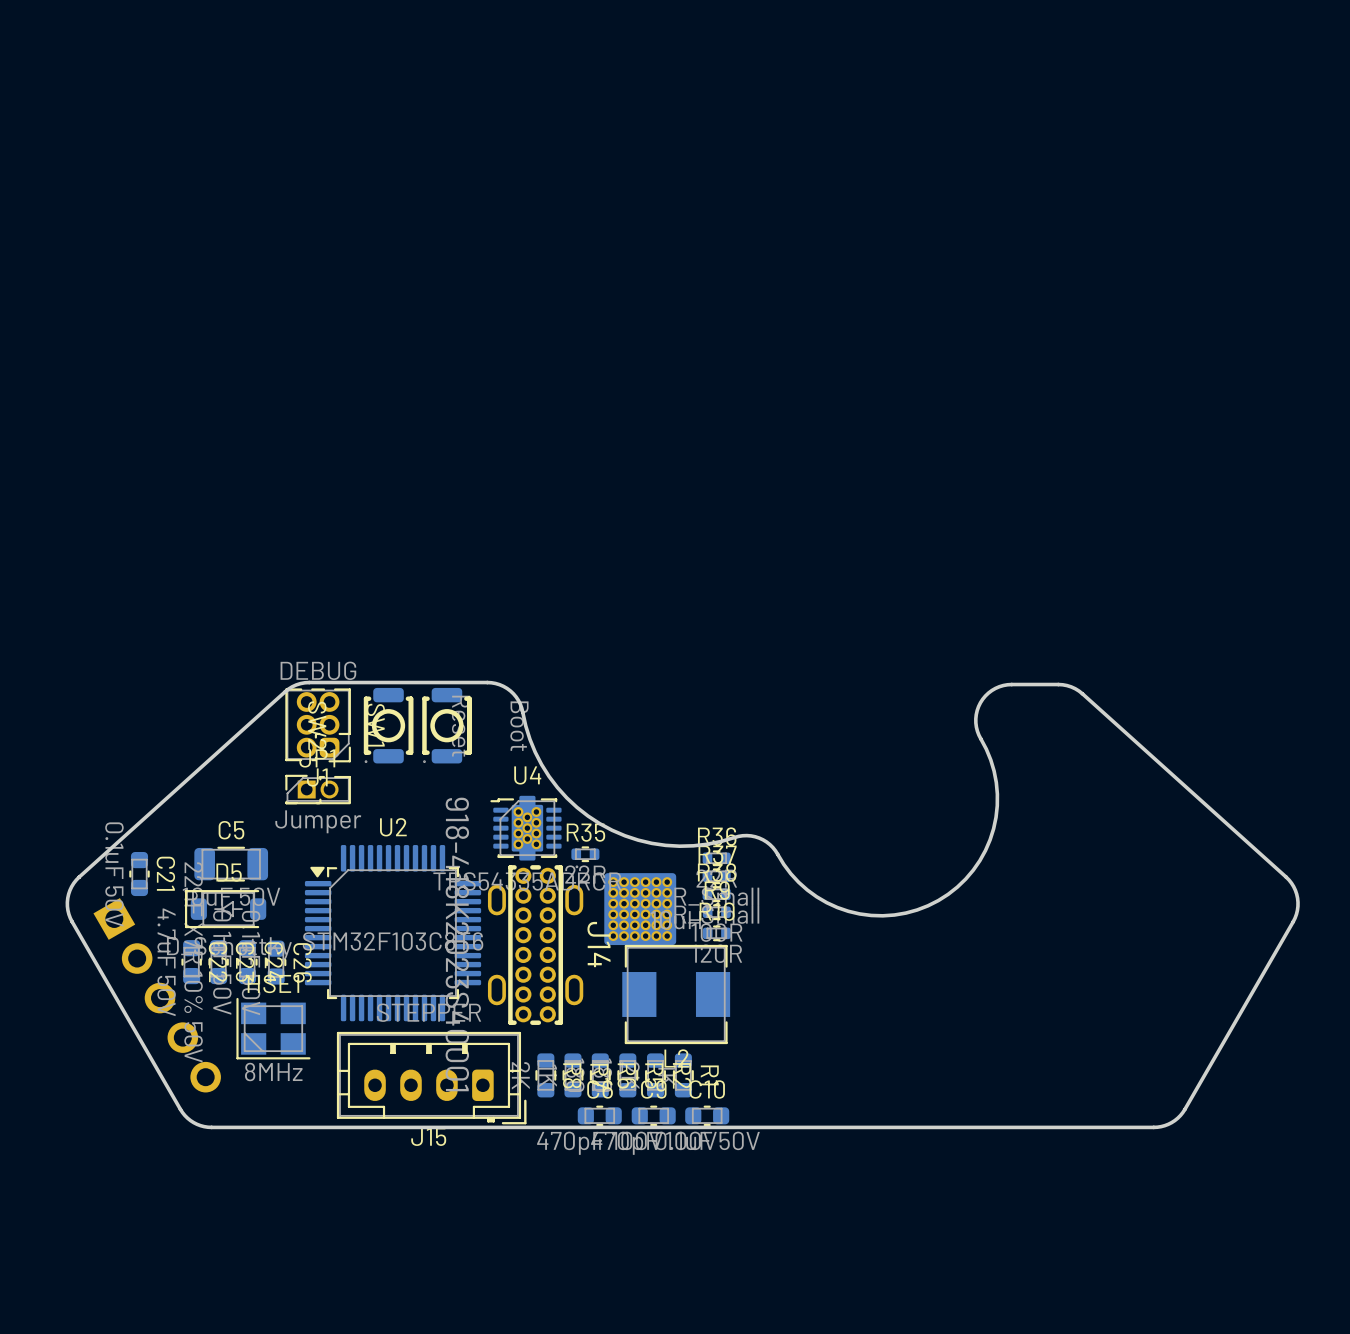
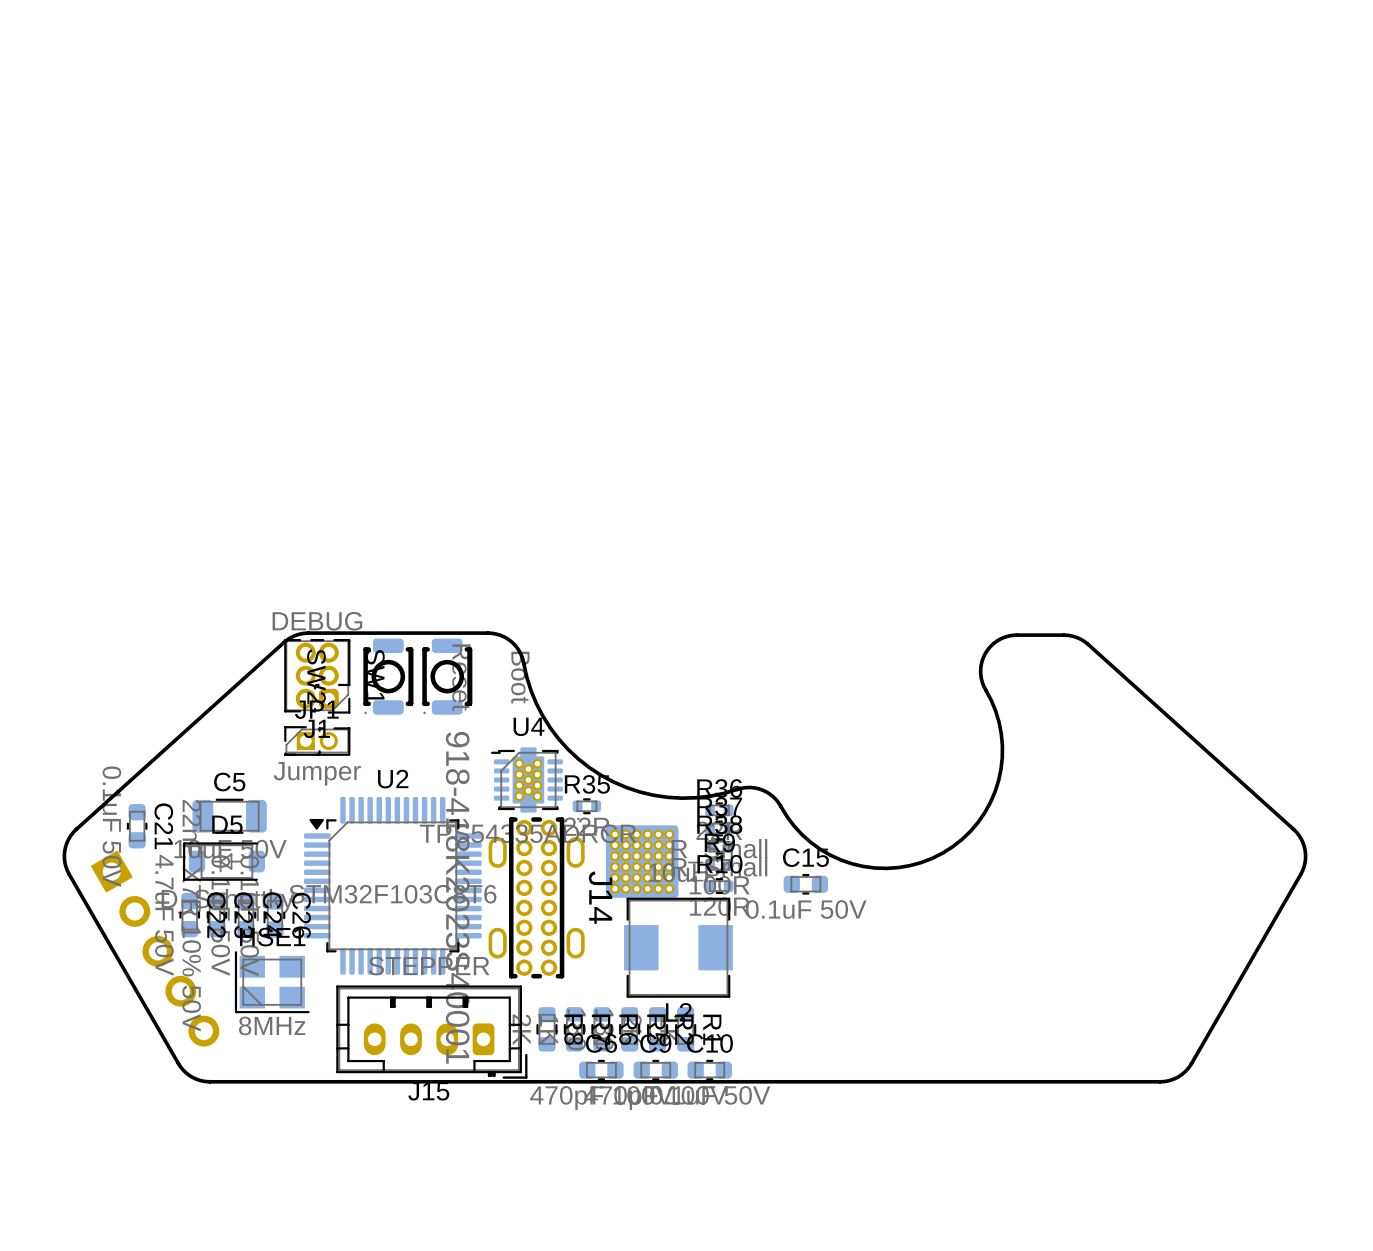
C15: none -> 0.1uF 50V (805, 884)

